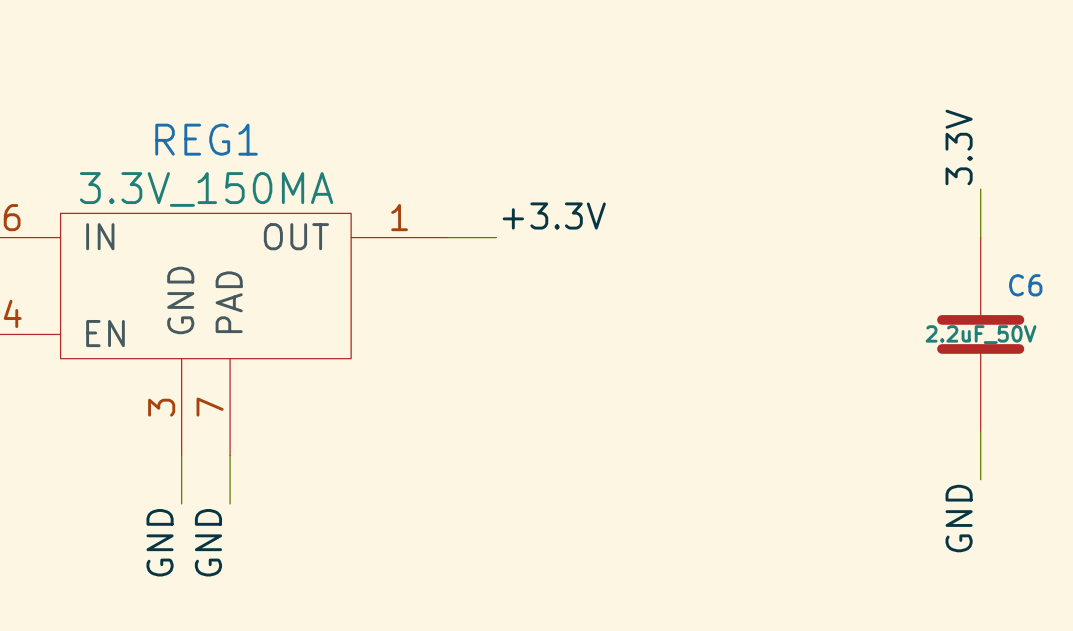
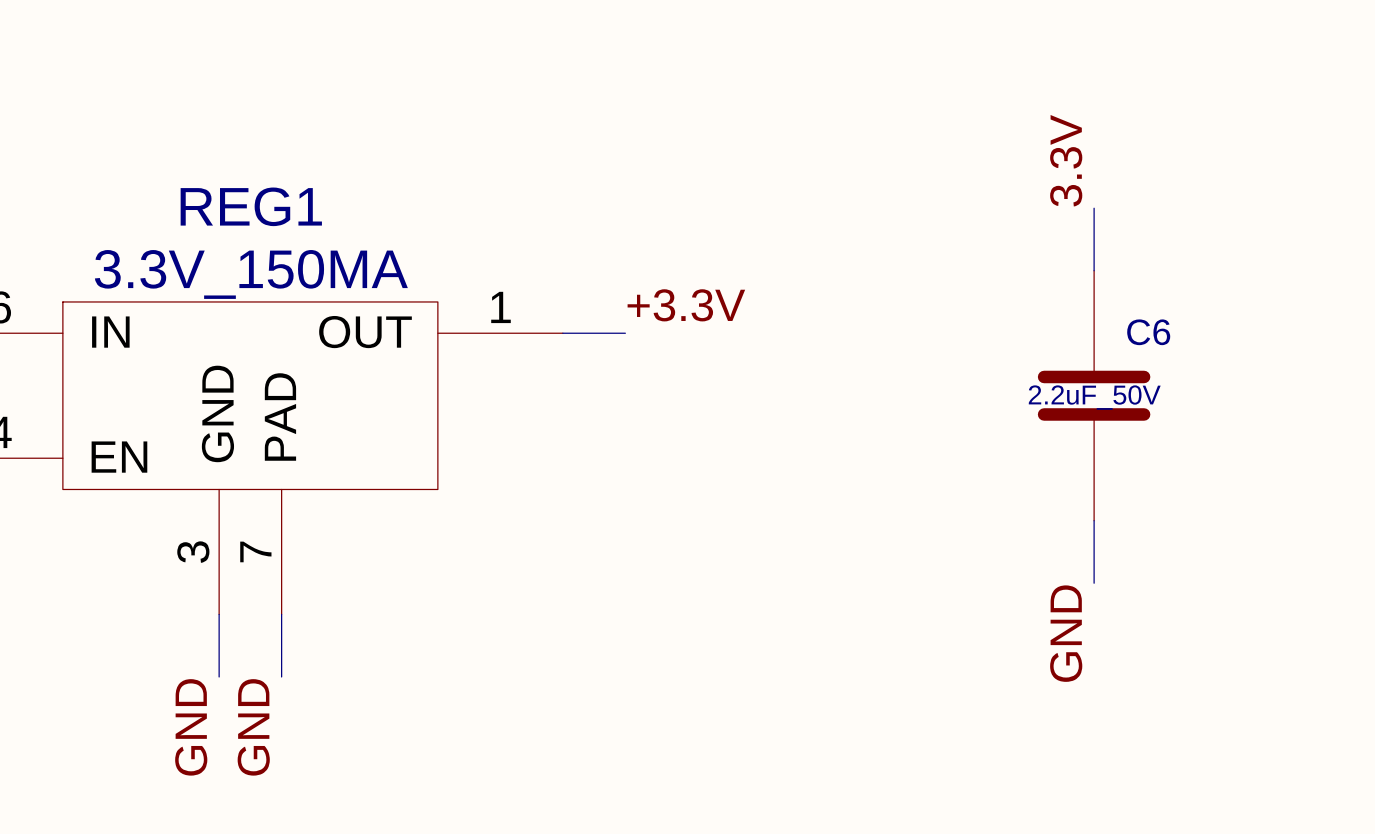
label position: 3.3V (959, 147) -> 3.3V (1066, 160)
wire: (980, 189) (980, 237) -> (1094, 208) (1094, 270)
C6 position: (980, 334) -> (1094, 395)
wire: (980, 431) (980, 479) -> (1094, 520) (1094, 583)
label position: GND (959, 518) -> GND (1066, 633)

